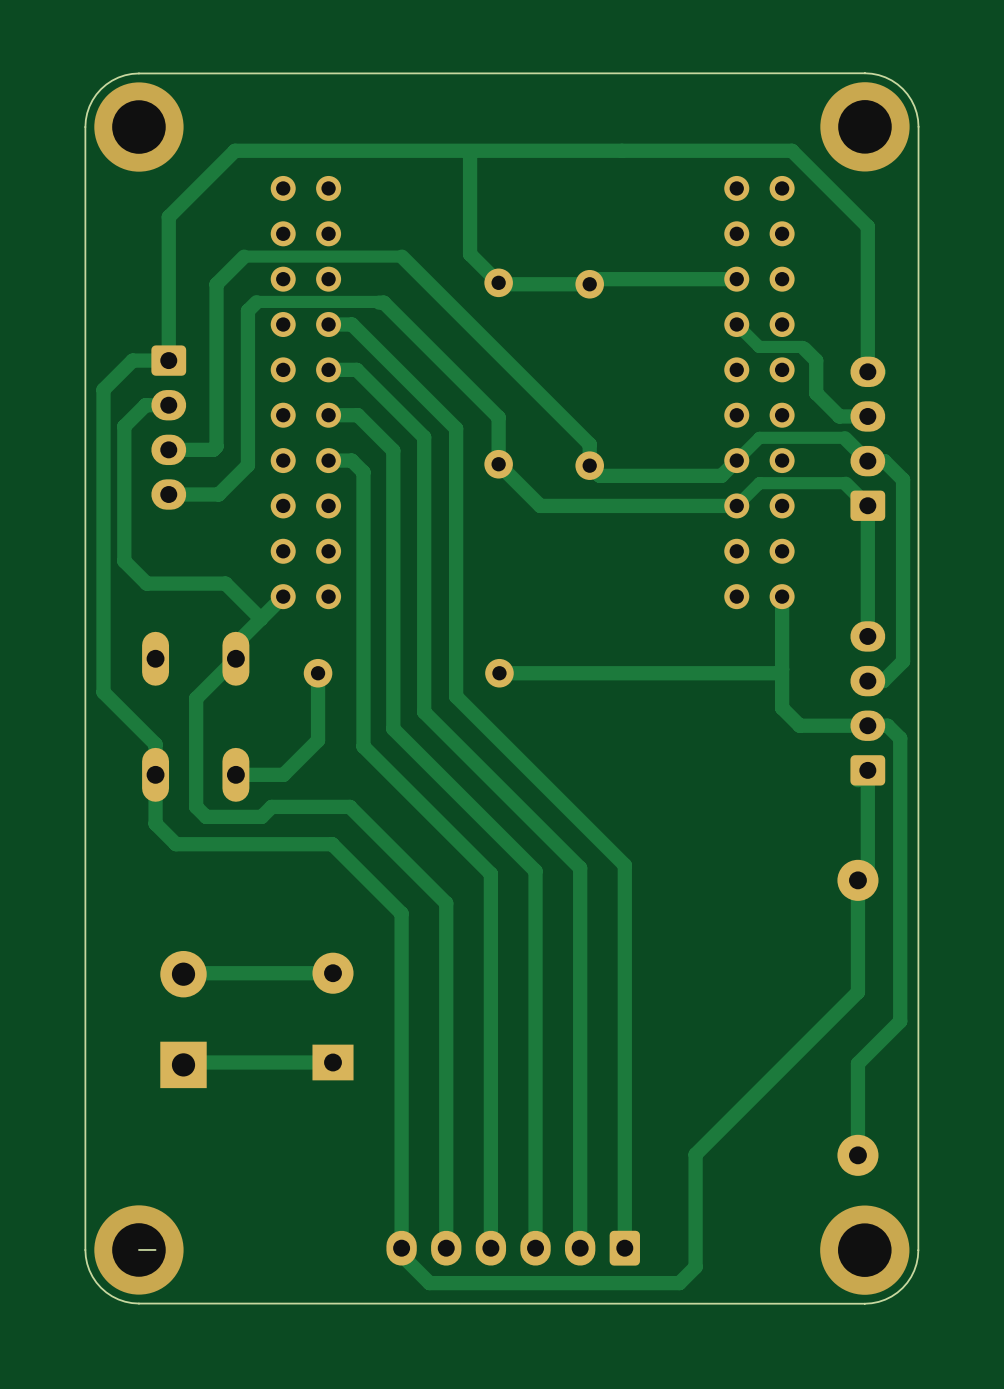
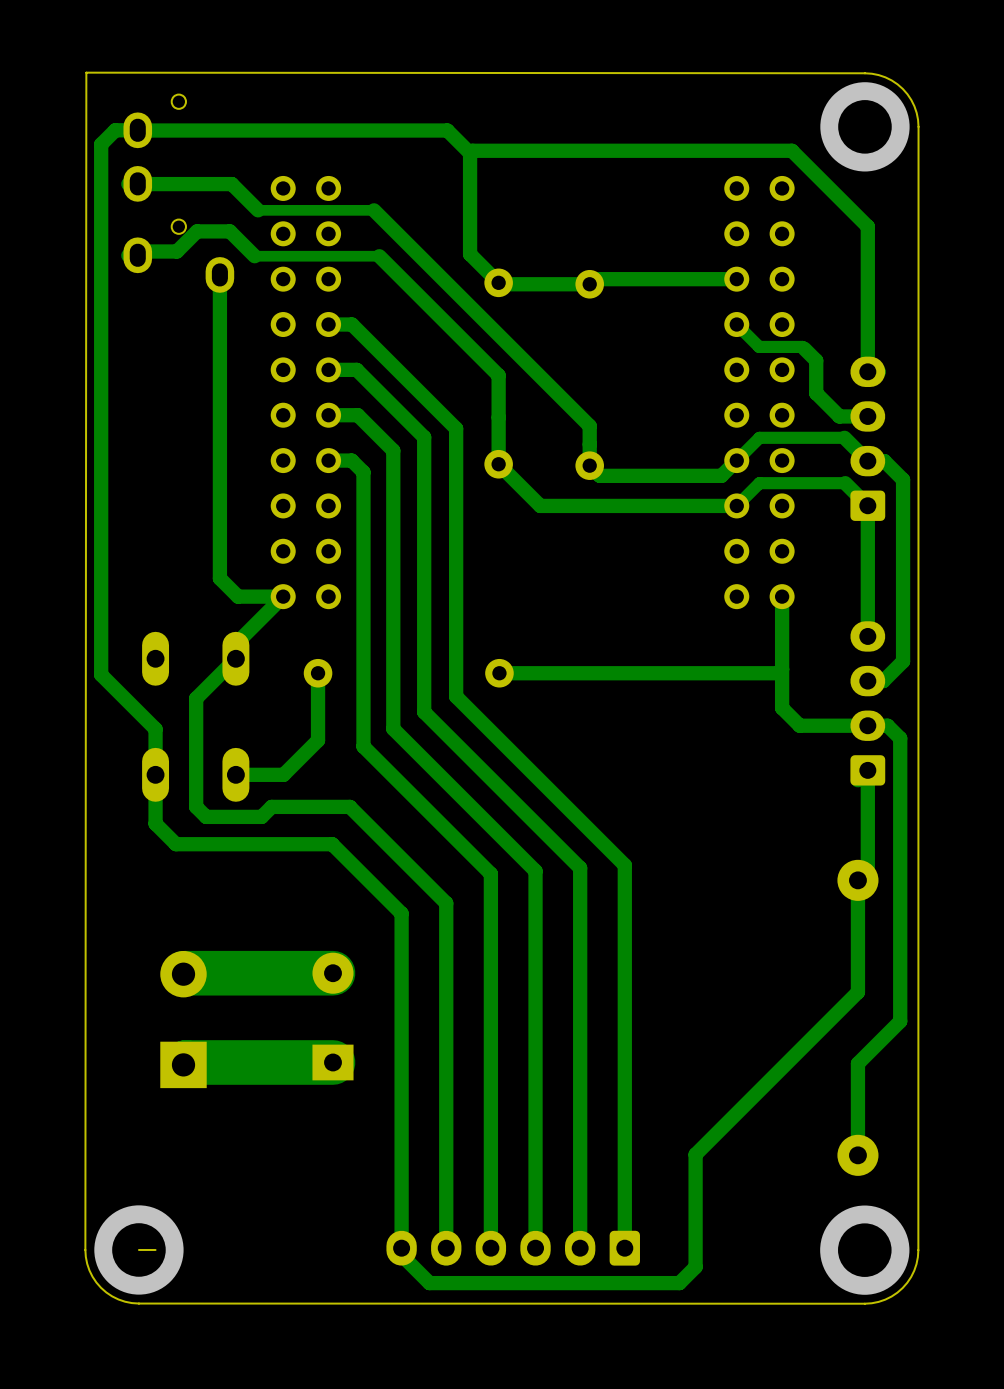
board edge: (864, 73) (138, 73) (125, 75) (112, 80) (101, 89) (92, 100) (87, 113) (85, 127) (85, 1249) -> (864, 73) (86, 72) (85, 1249)
via: (138, 127) -> none
track: none -> (128, 130) (447, 130) (470, 153) (472, 150)
track: (472, 150) (235, 150) (168, 217) (168, 360) (132, 360) (103, 389) (103, 692) (155, 744) -> (137, 130) (115, 130) (101, 144) (101, 674) (155, 729) (155, 744)
part: none -> (178, 193)
track: none -> (219, 274) (219, 578) (238, 596) (283, 596)
track: (168, 405) (145, 405) (124, 426) (124, 561) (146, 583) (225, 583) (260, 618) -> none
track: (498, 417) (383, 302) (256, 301) (247, 310) (247, 465) (218, 494) (168, 494) -> (498, 417) (498, 375) (379, 256) (254, 256) (229, 231) (197, 231) (176, 251) (132, 251) (128, 255)
part: (168, 427) -> none
track: (589, 444) (401, 256) (244, 256) (216, 284) (216, 446) (213, 449) (168, 449) -> (589, 444) (589, 426) (374, 210) (258, 210) (231, 184) (128, 184)
track width: thin (333, 973) (183, 974) -> thick (333, 973) (183, 974)
track width: thin (333, 1062) (185, 1062) (183, 1064) -> thick (333, 1062) (185, 1062) (183, 1064)

